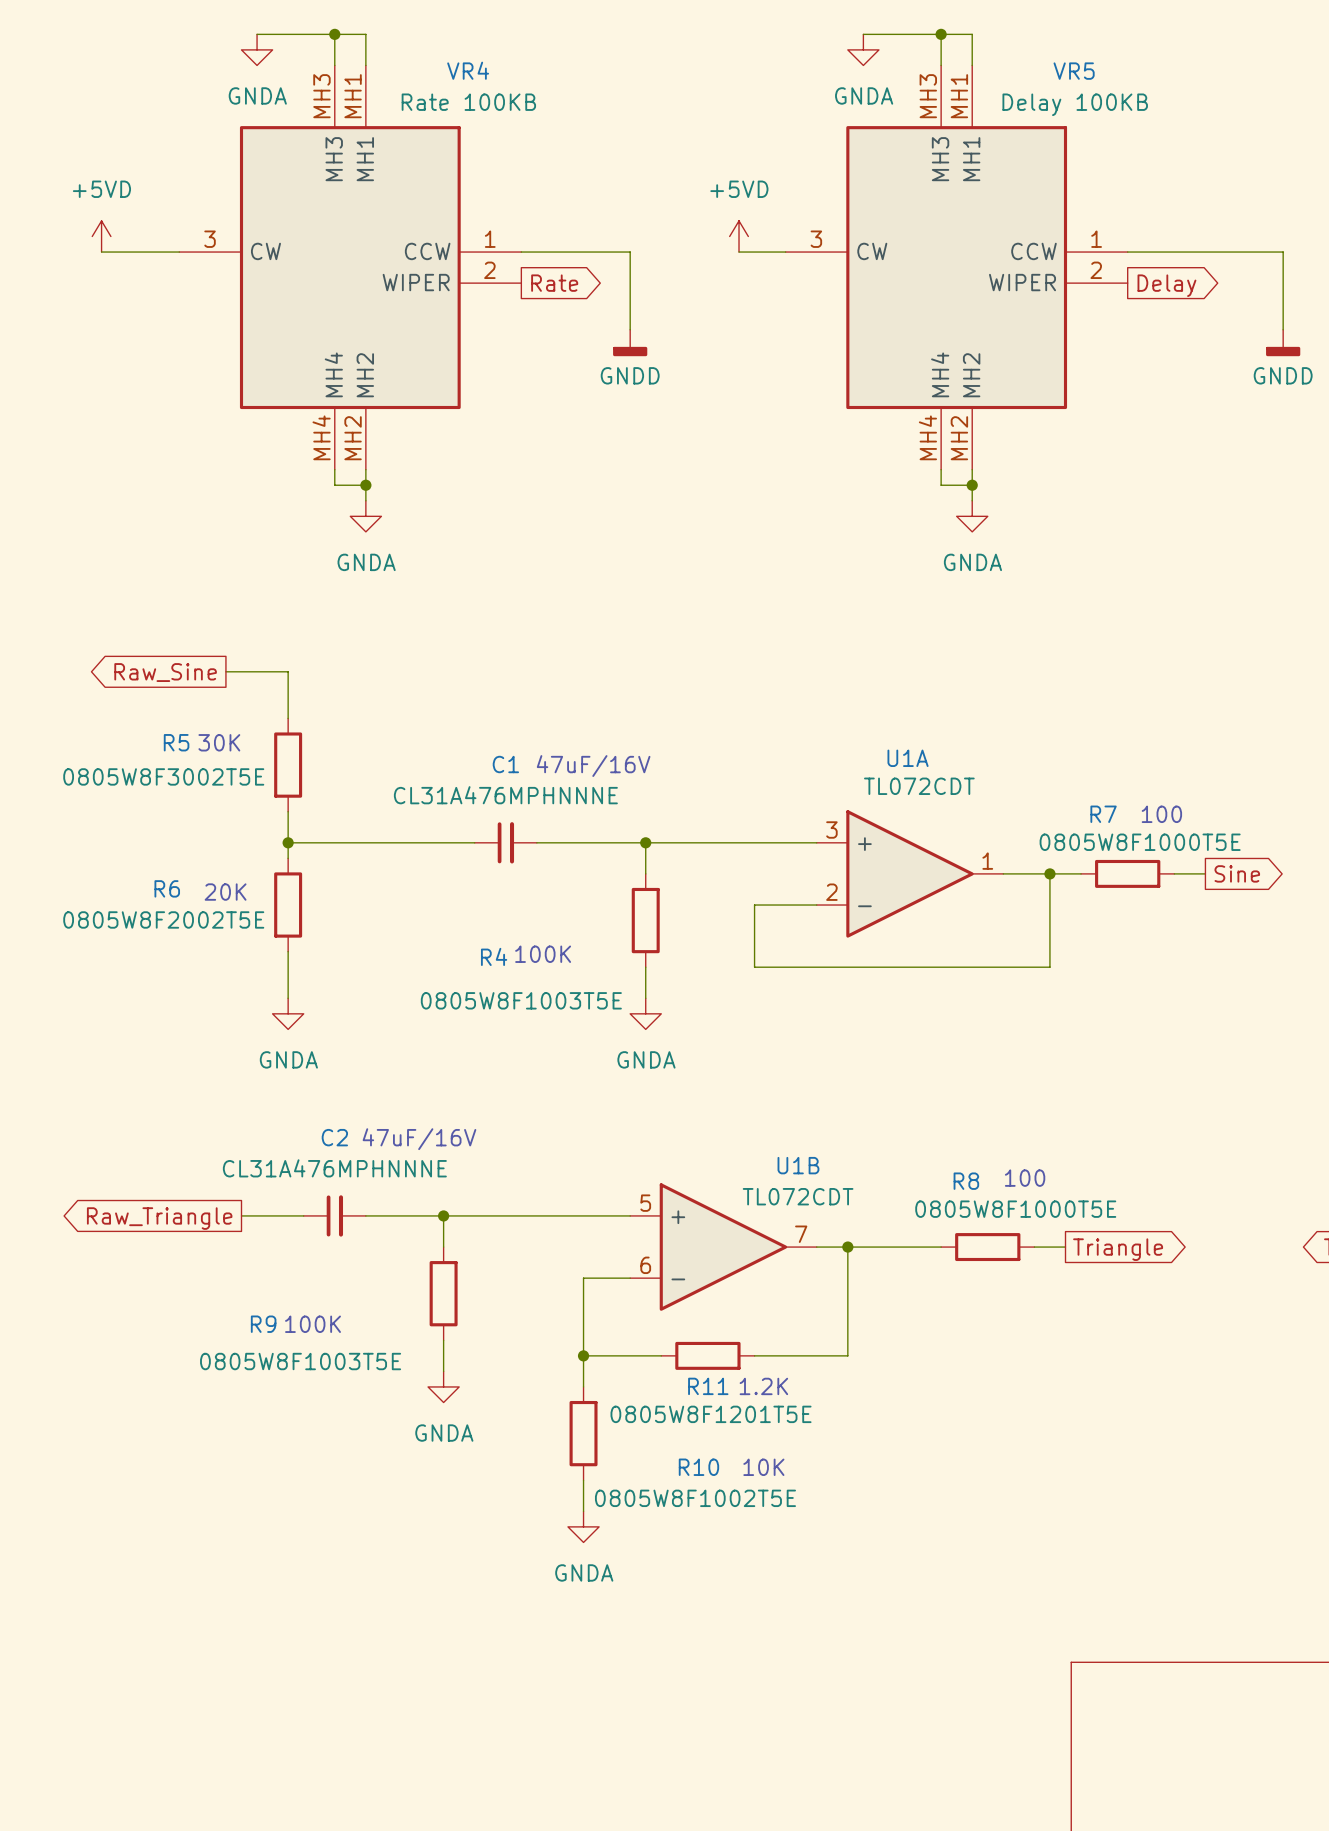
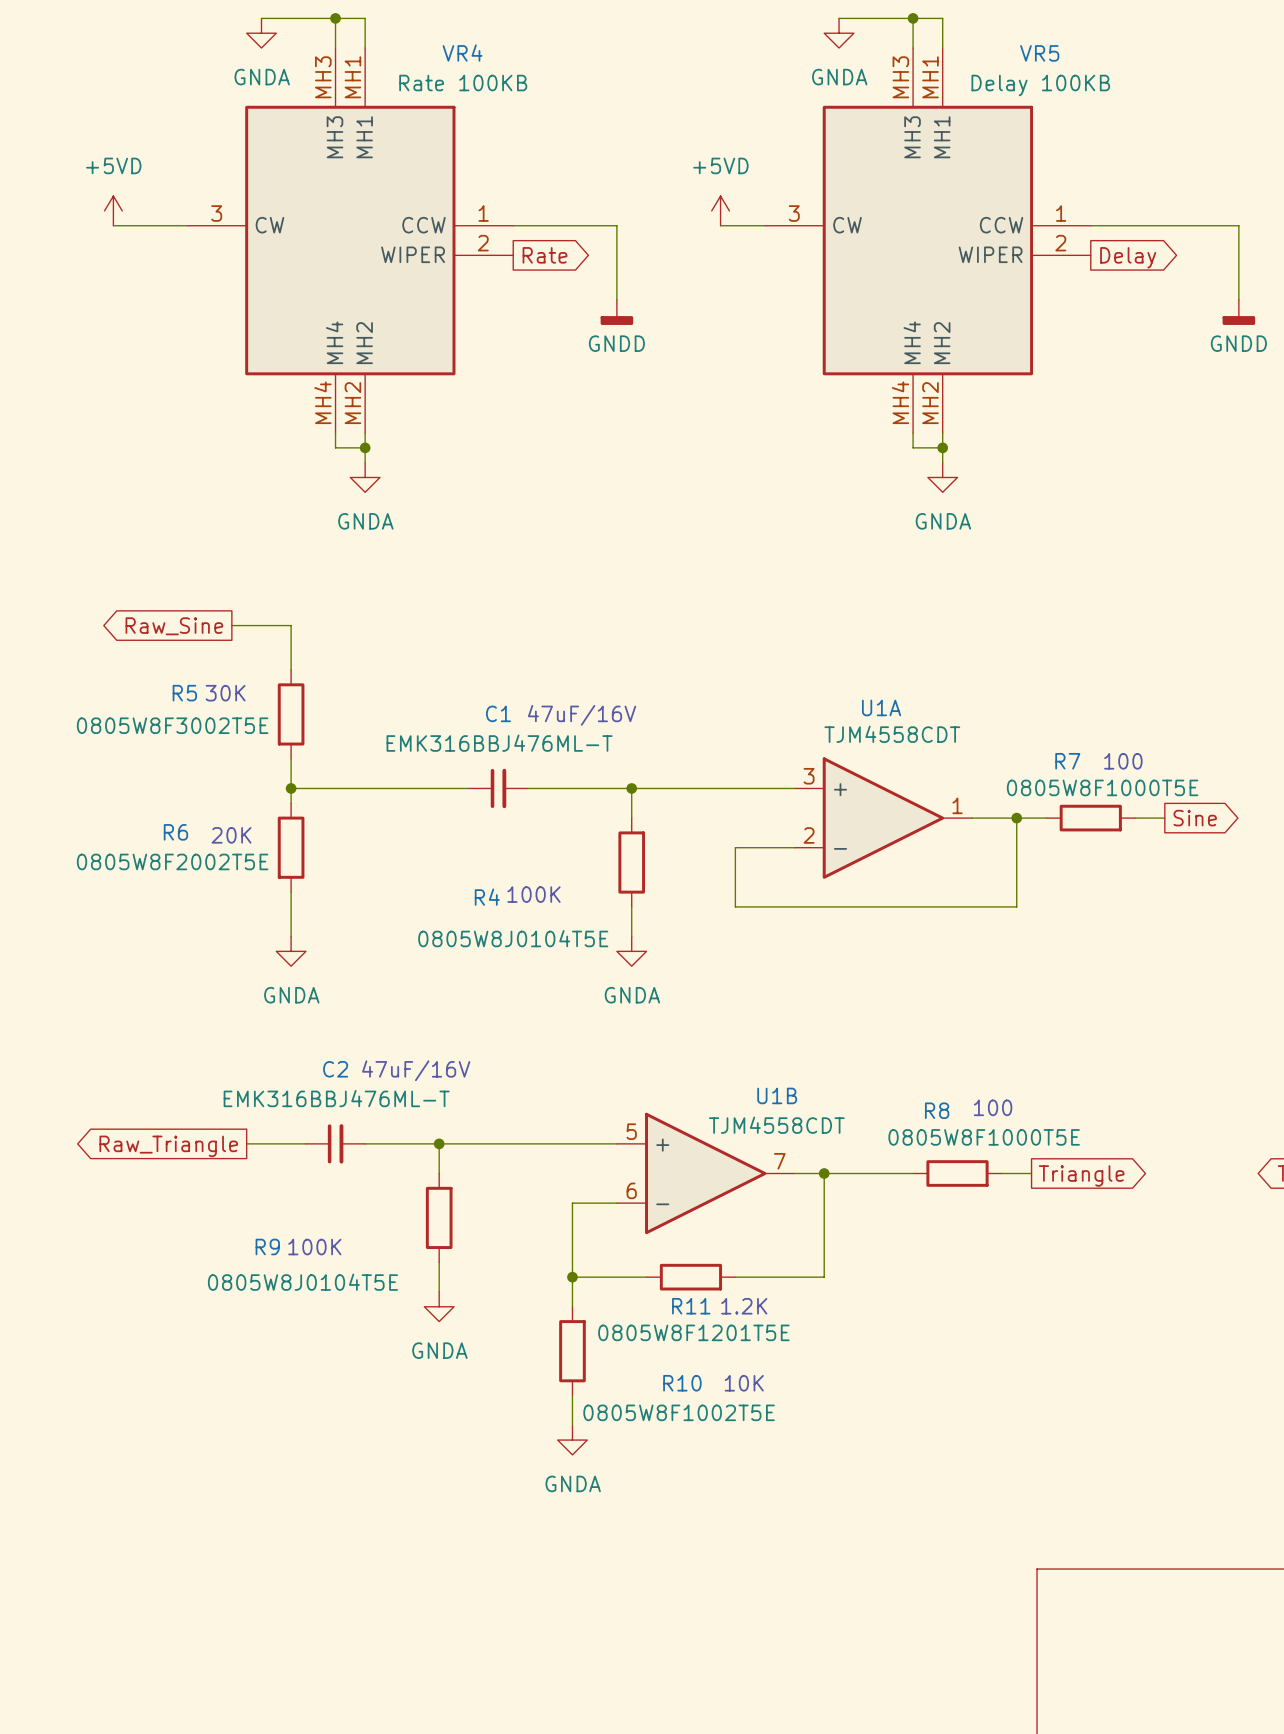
U1A value: TL072CDT (919, 786) -> TJM4558CDT (892, 734)
C1 value: CL31A476MPHNNNE (505, 795) -> EMK316BBJ476ML-T (499, 743)
R4 value: 0805W8F1003T5E (521, 1000) -> 0805W8J0104T5E (513, 938)
C2 value: CL31A476MPHNNNE (334, 1168) -> EMK316BBJ476ML-T (336, 1098)
U1B value: TL072CDT (798, 1196) -> TJM4558CDT (776, 1125)
R9 value: 0805W8F1003T5E (300, 1361) -> 0805W8J0104T5E (302, 1282)

